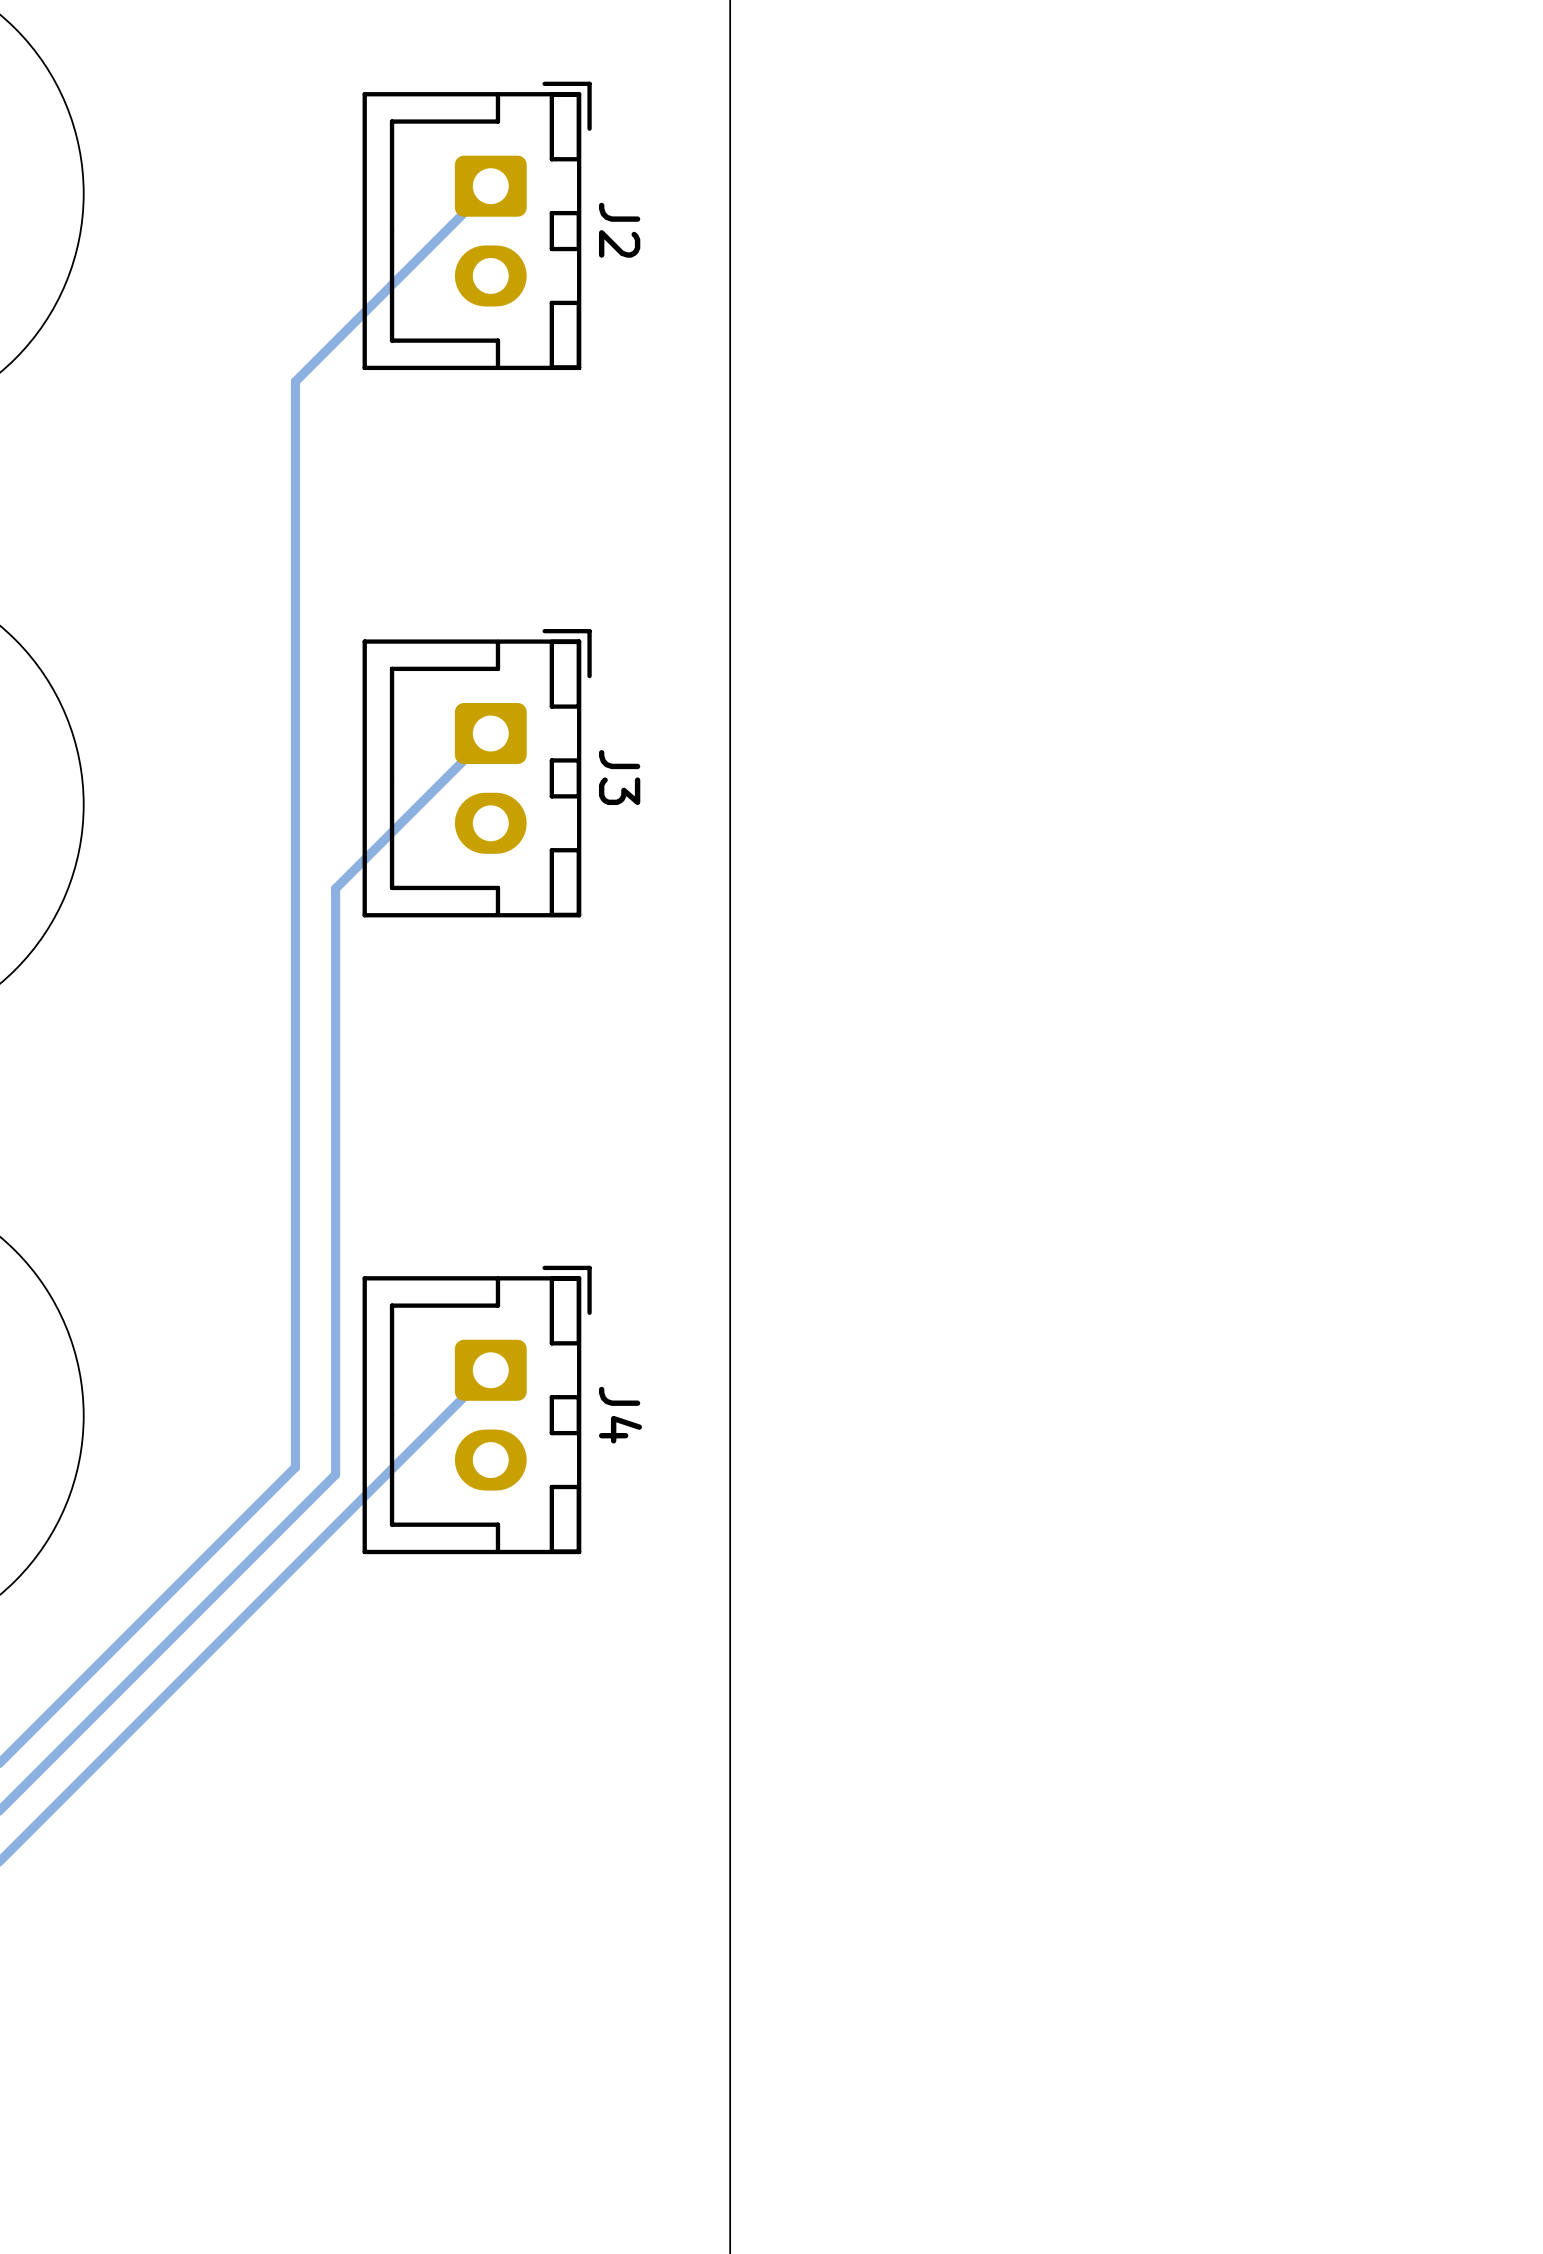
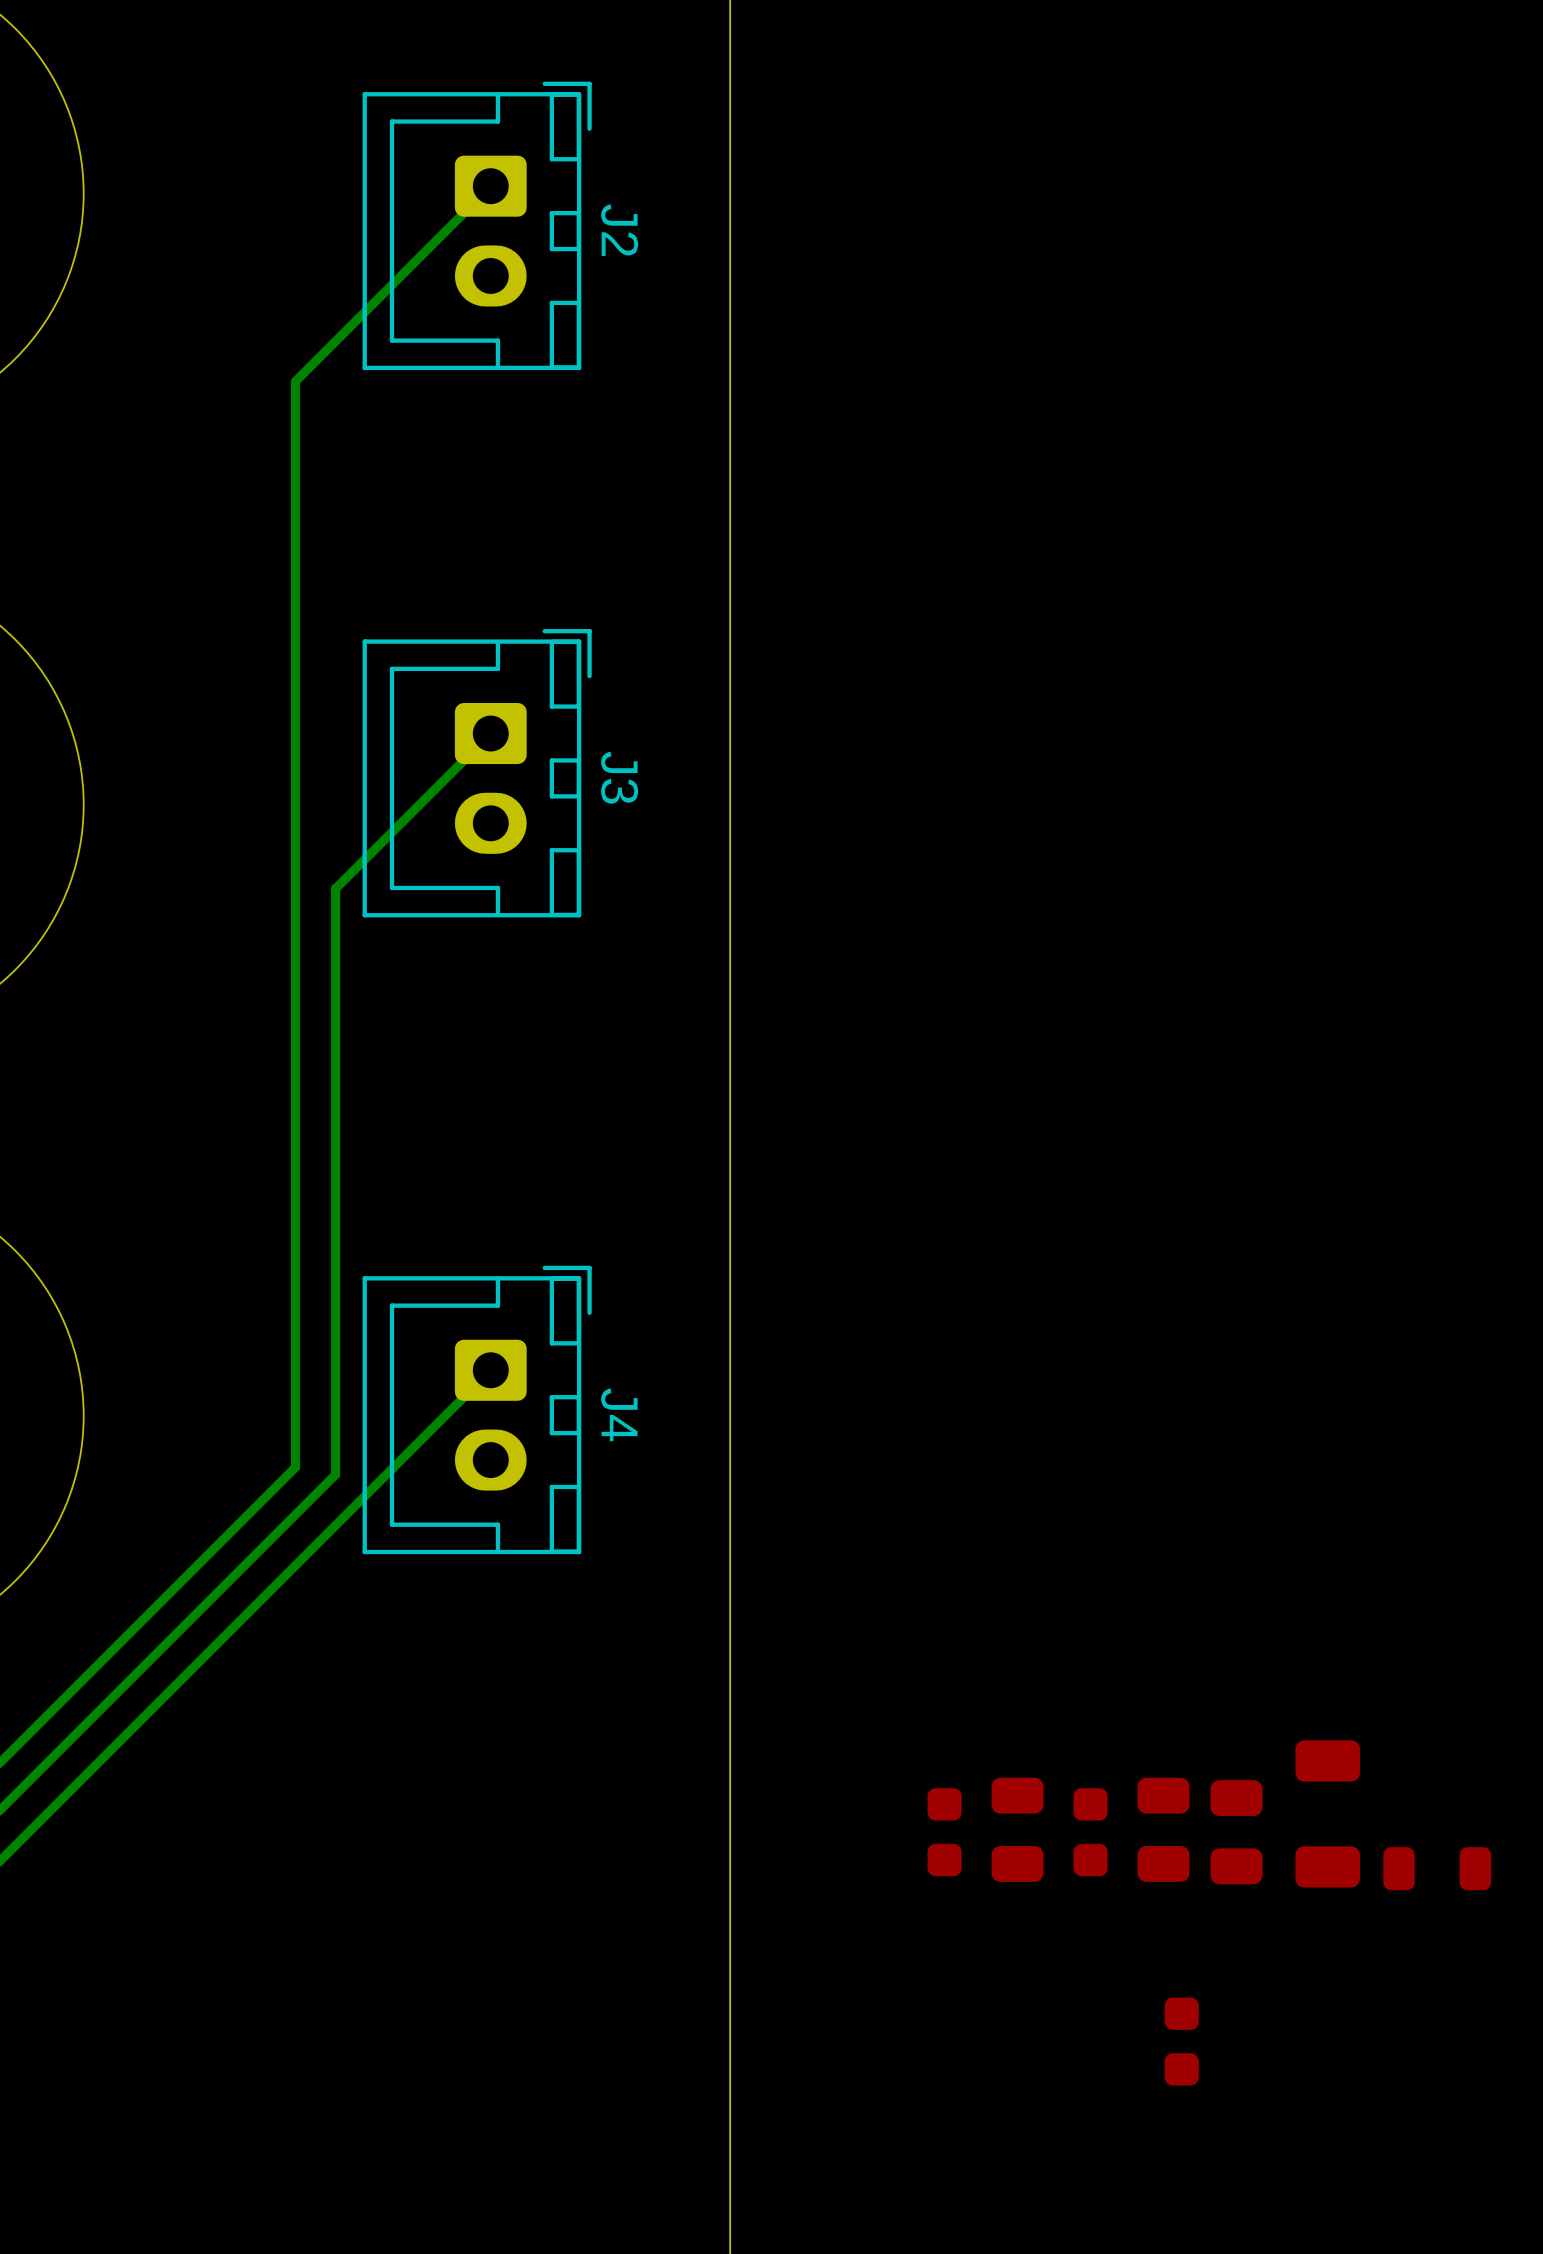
part: none -> (1327, 1813)
part: none -> (1017, 1829)
part: none -> (1163, 1829)
part: none -> (944, 1832)
part: none -> (1090, 1832)
part: none -> (1236, 1832)
part: none -> (1437, 1868)
part: none -> (1181, 2041)

